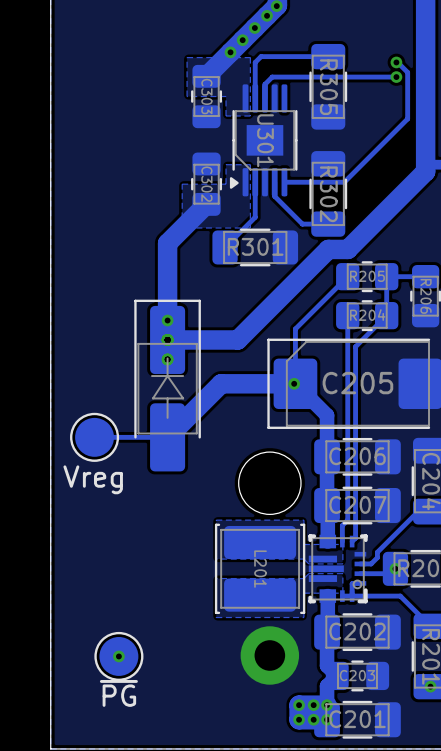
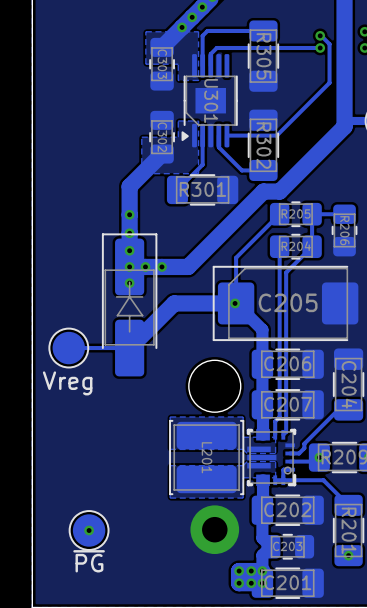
via: none -> (129, 214)
via: none -> (129, 233)
via: none -> (145, 266)
via: none -> (161, 266)

